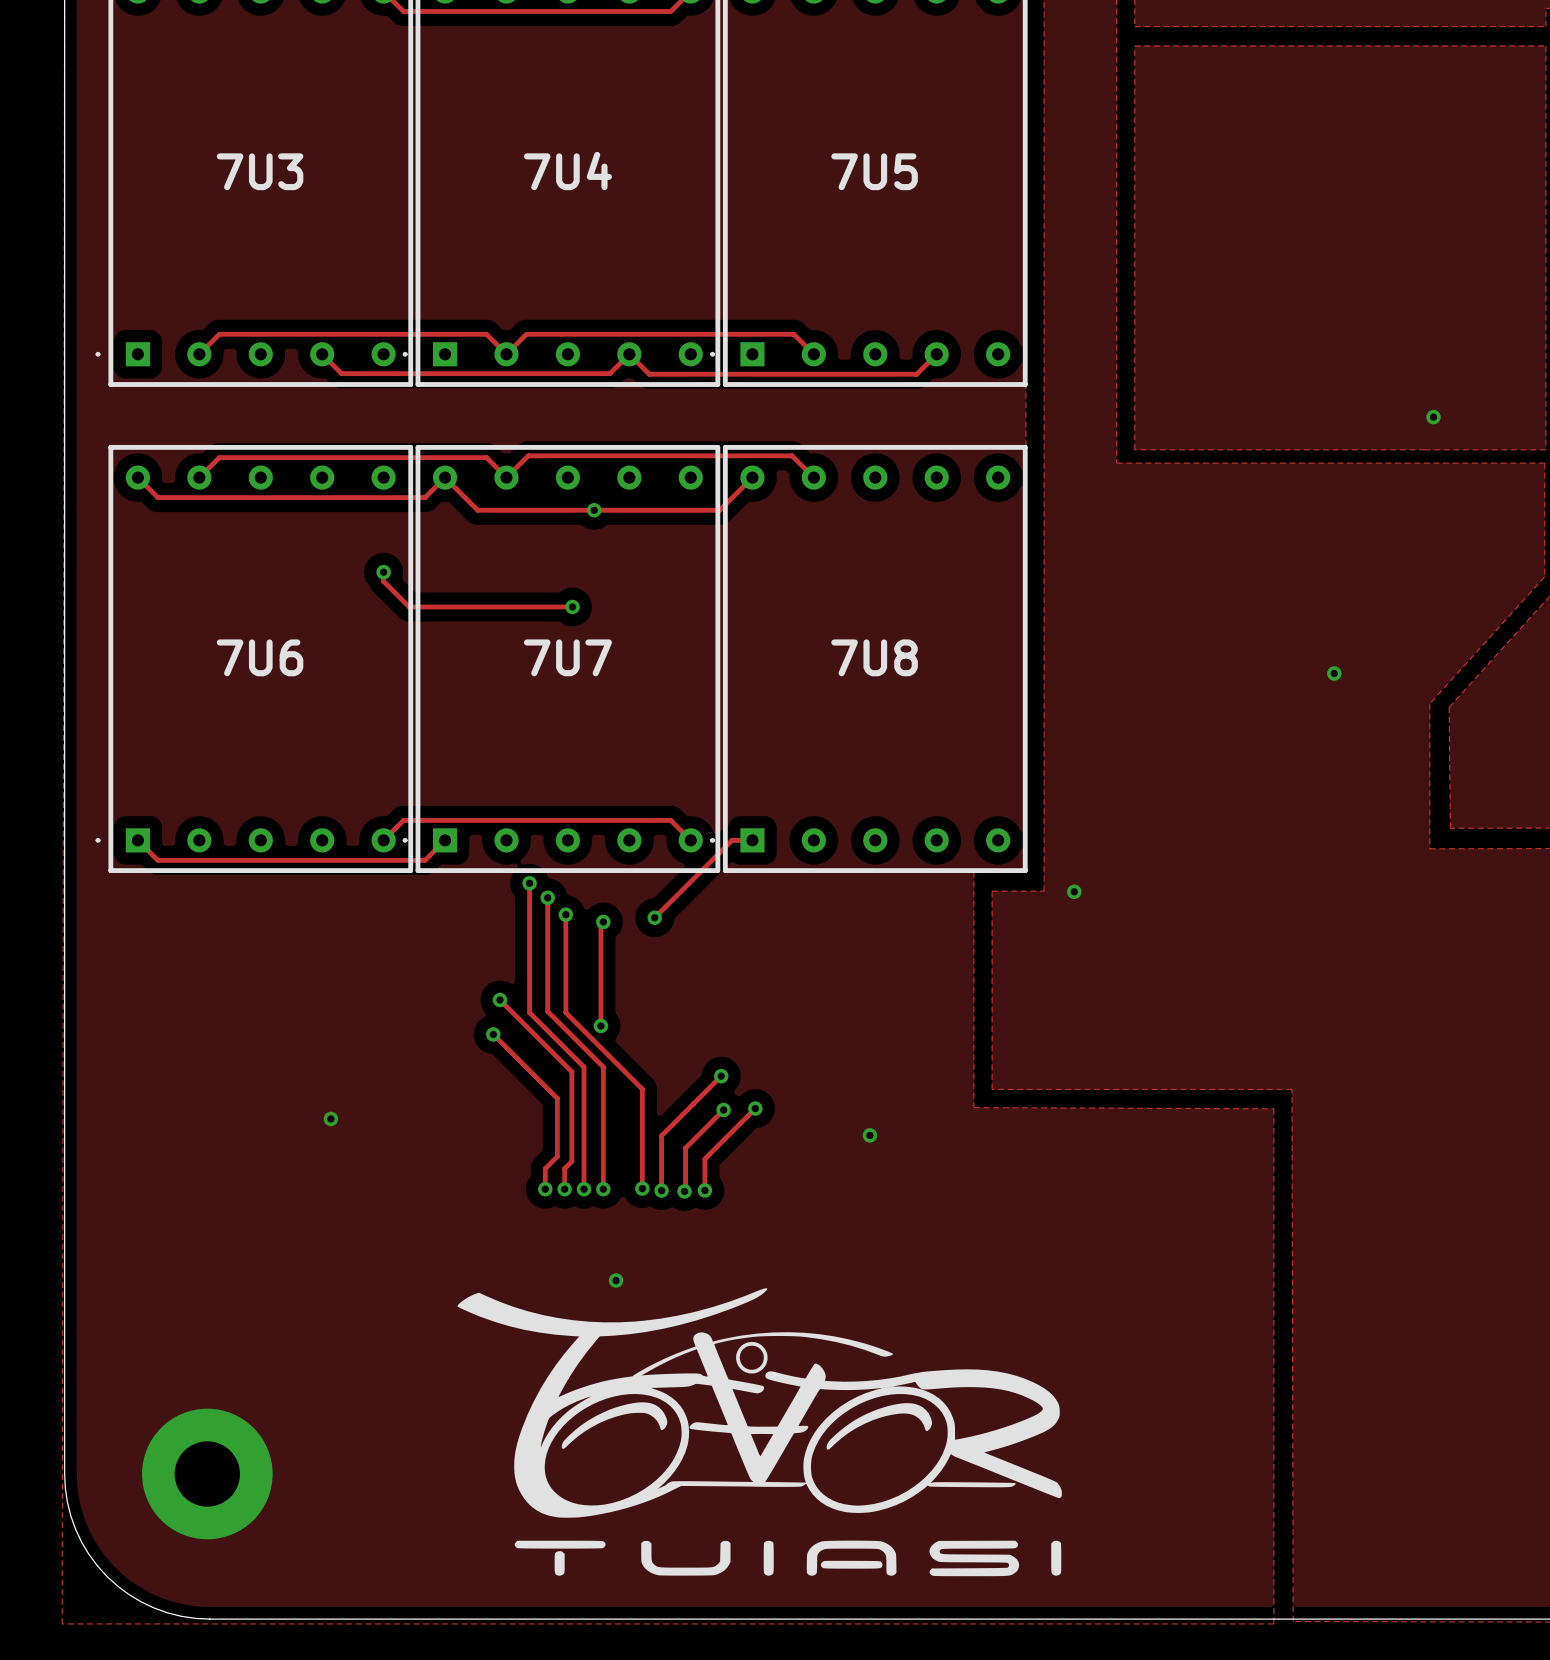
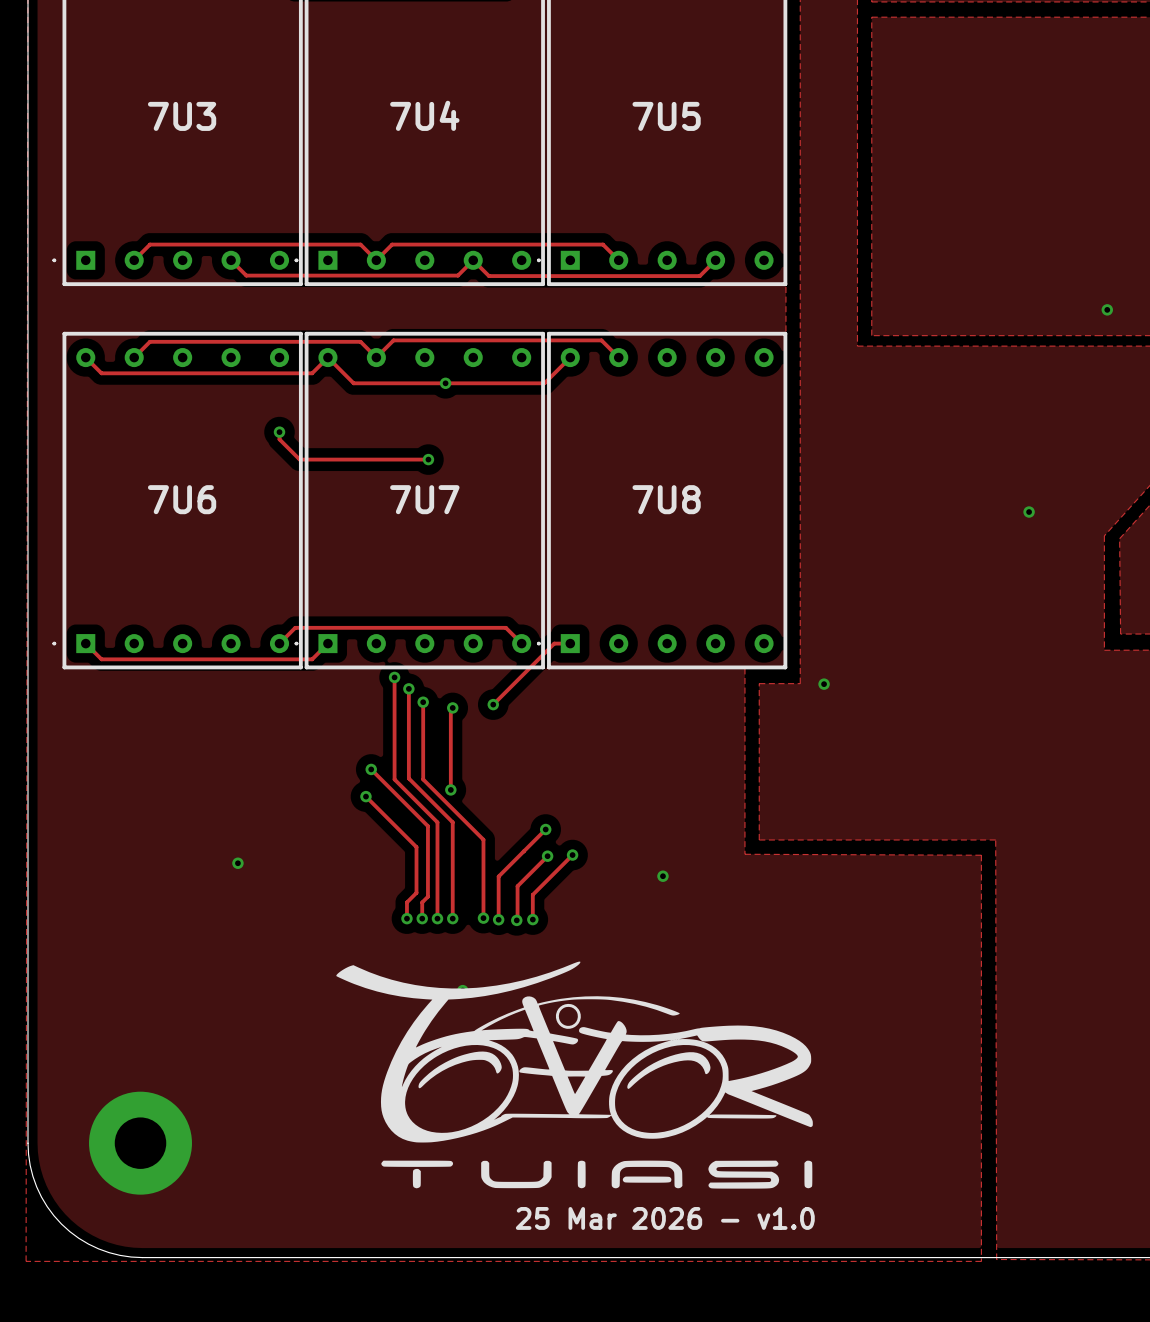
drawing position: (759, 1432) -> (574, 1075)
text: none -> 25 Mar 2026 - v1.0 (665, 1218)

